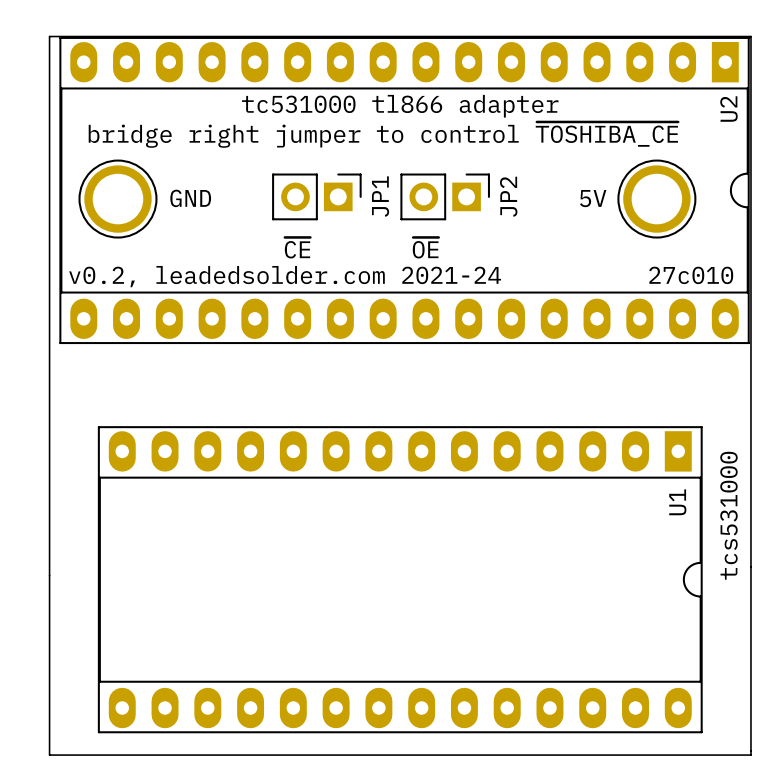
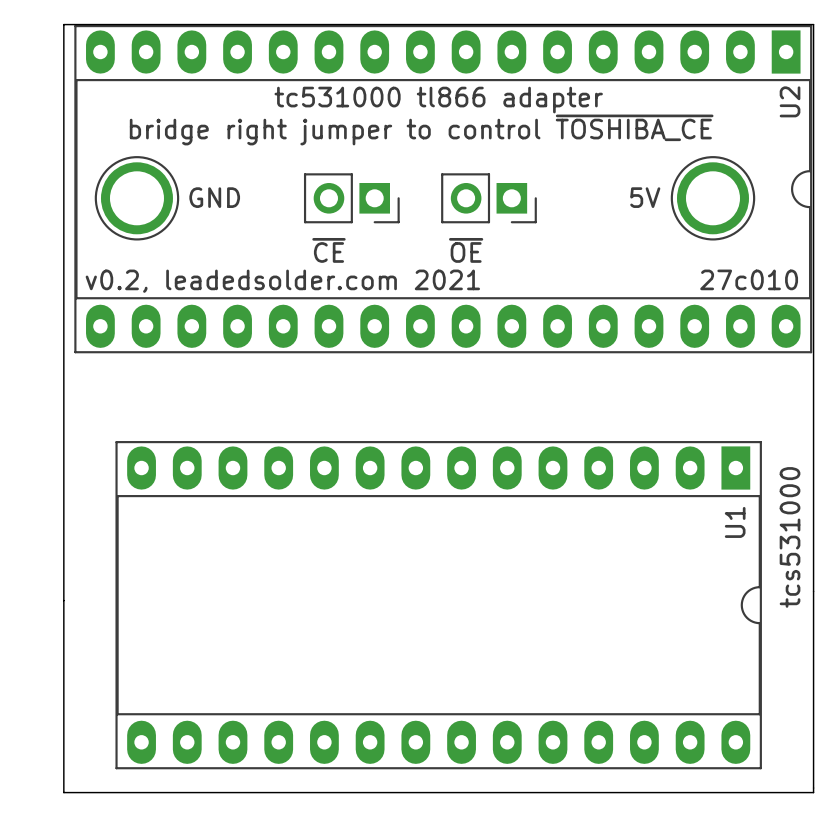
JP1: (316, 196) -> none
JP2: (445, 196) -> none
part: none -> (351, 198)
part: none -> (488, 198)
text: v0.2, leadedsolder.com 2021-24 (285, 276) -> v0.2, leadedsolder.com 2021 (282, 281)

